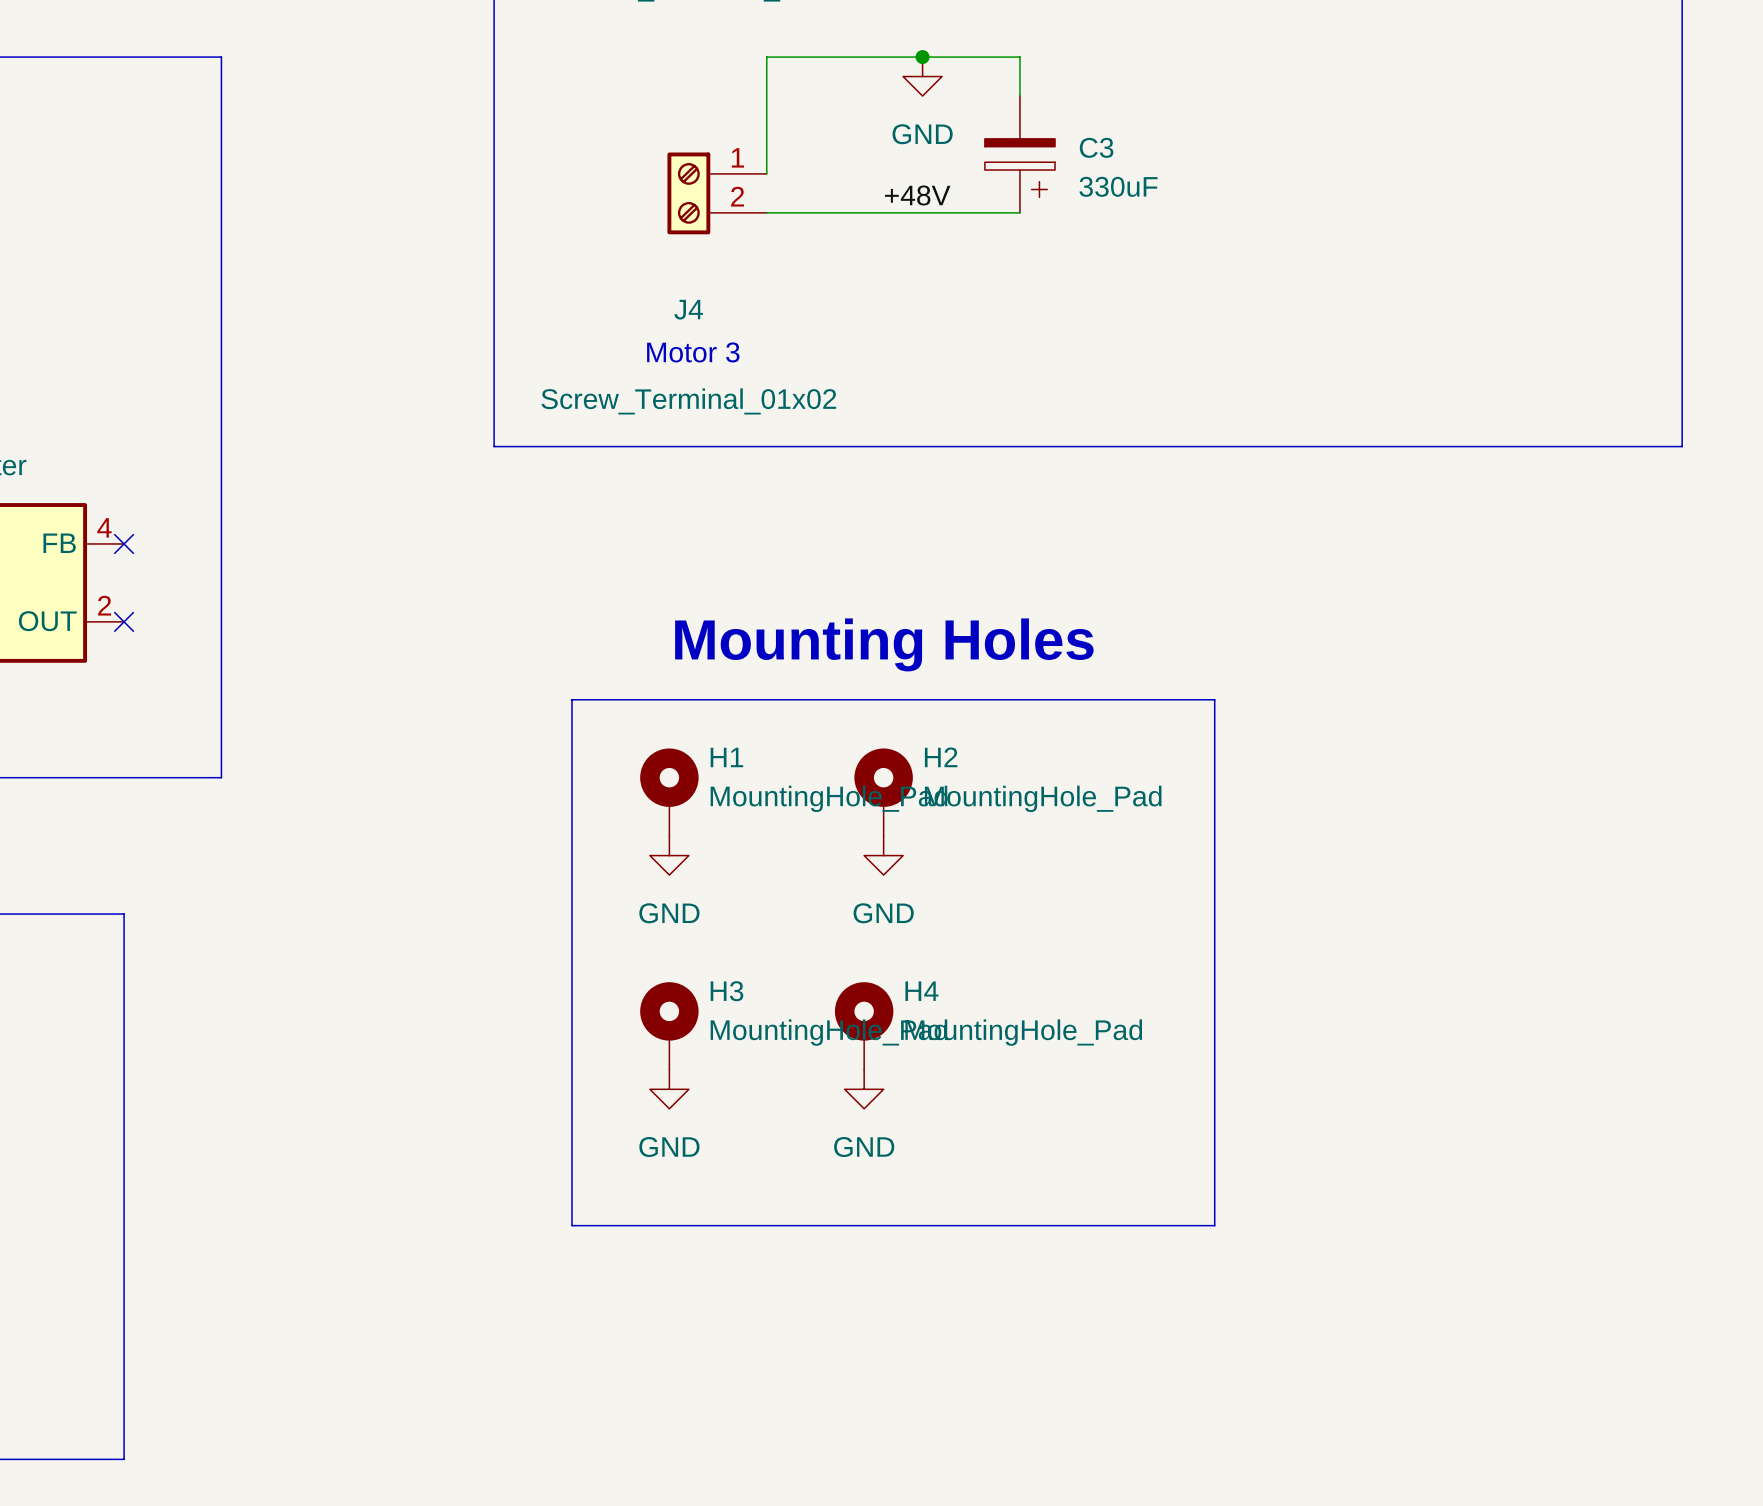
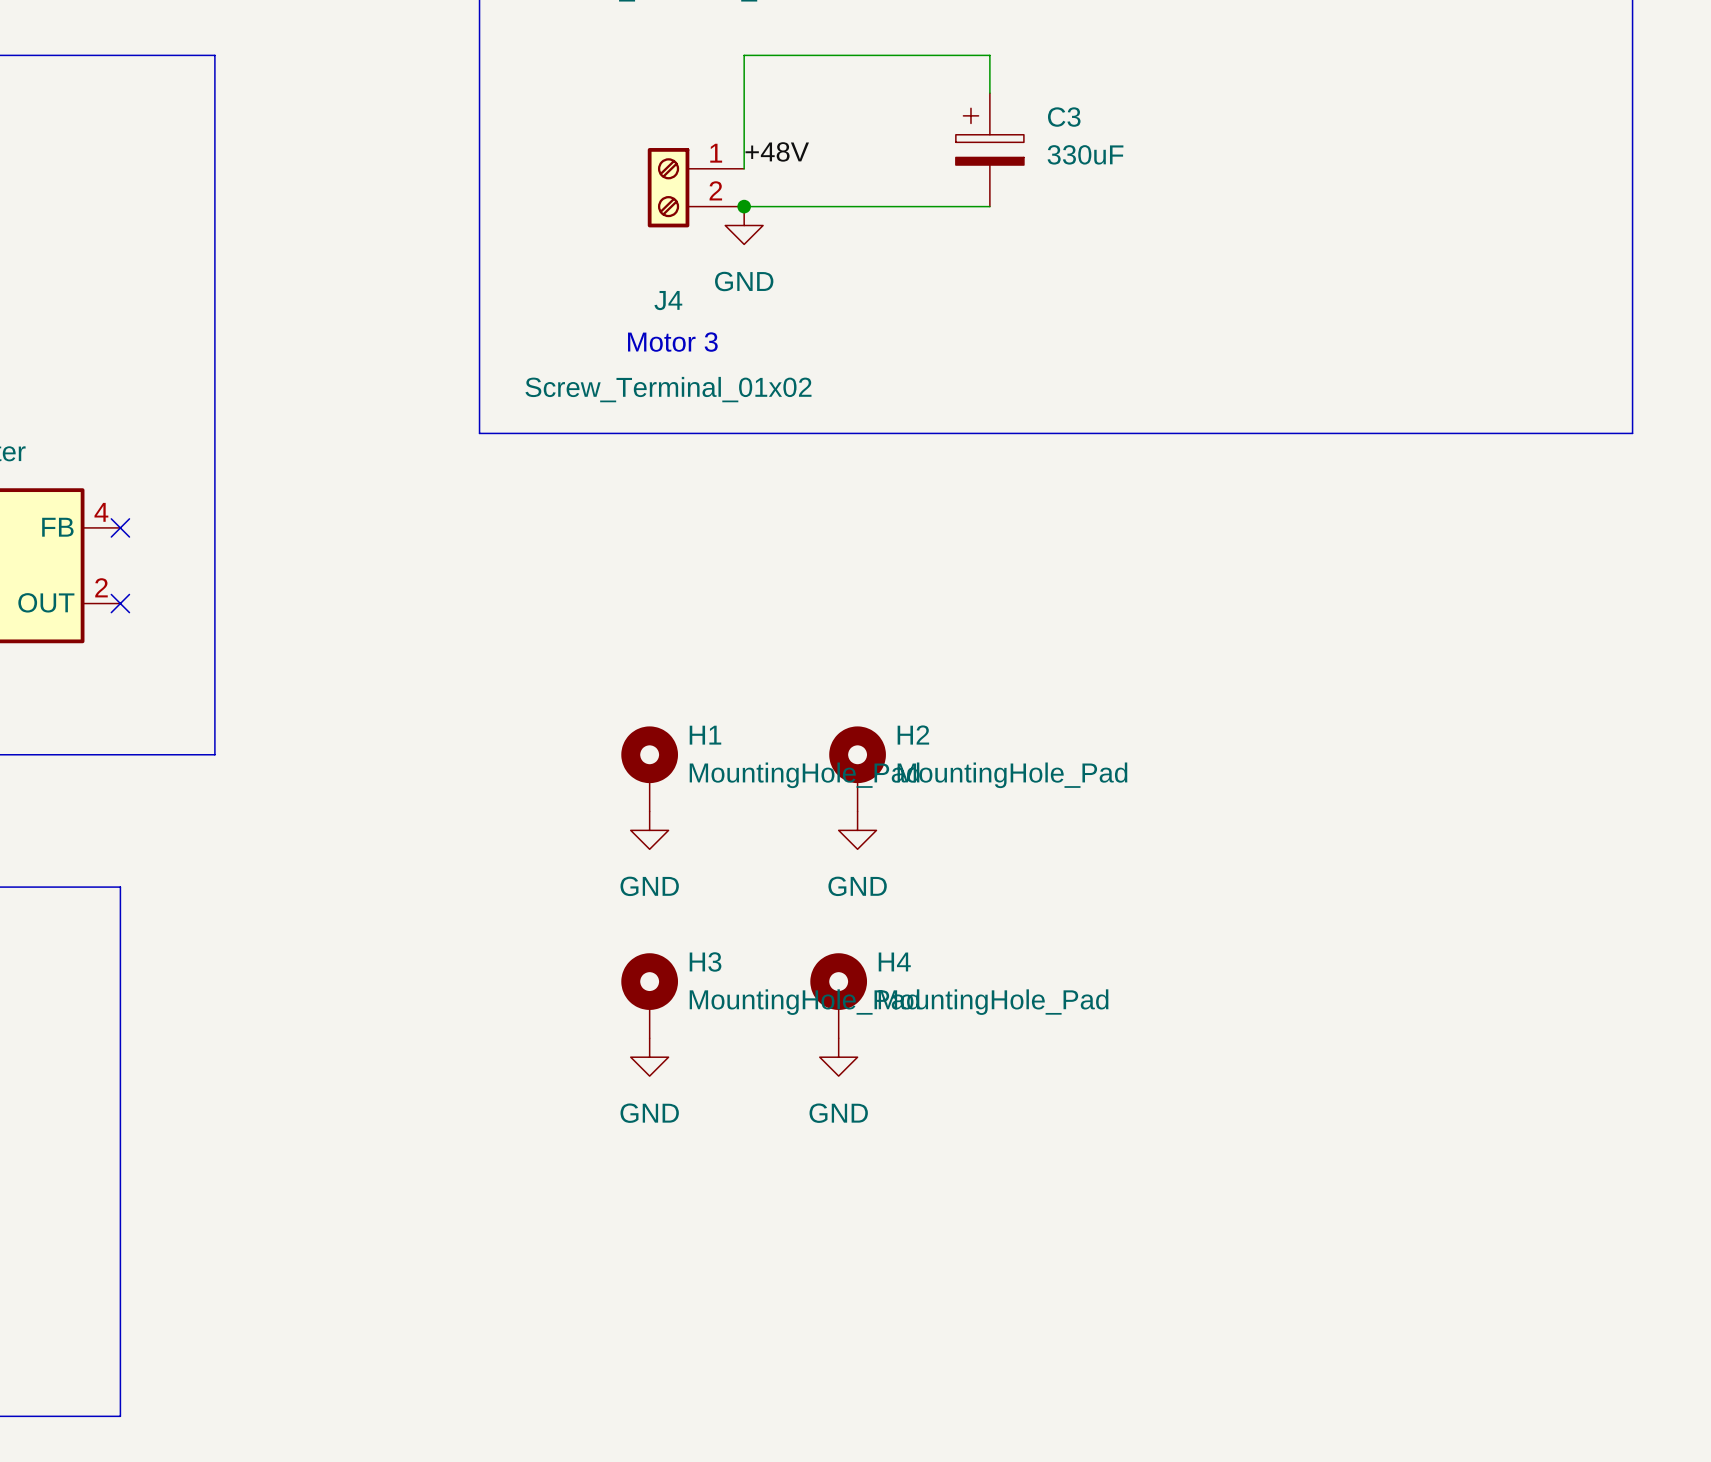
junction: (922, 57) -> none
power symbol position: GND (922, 76) -> GND (744, 225)
C3 rotation: 0° (1019, 168) -> 180° (989, 136)
label position: +48V (917, 195) -> +48V (777, 151)
junction: none -> (744, 206)
text: Mounting Holes (884, 644) -> none
line: (572, 699) (1214, 699) (1214, 1225) (572, 1225) (572, 699) -> none

